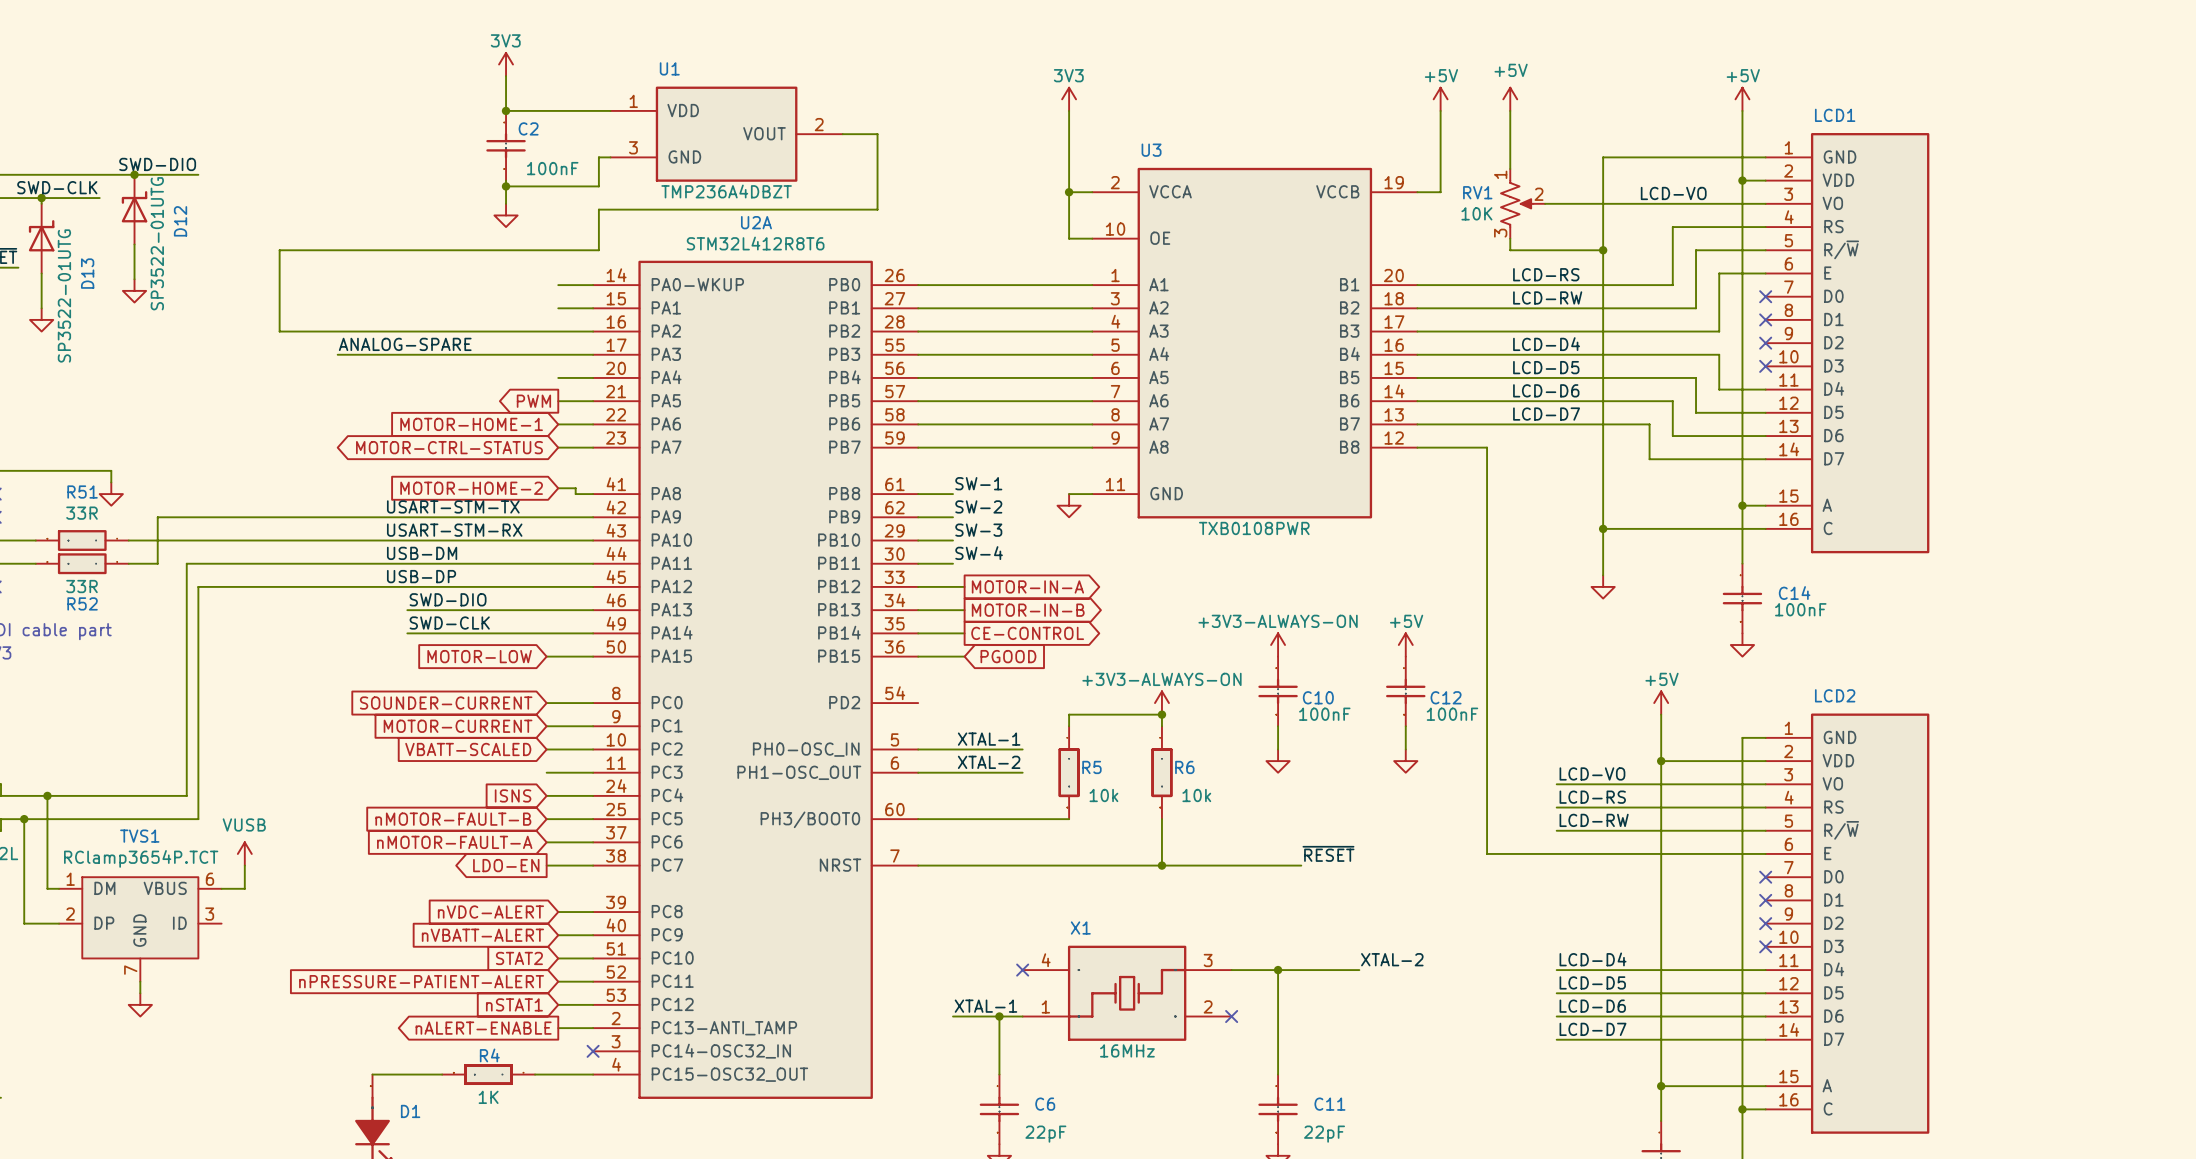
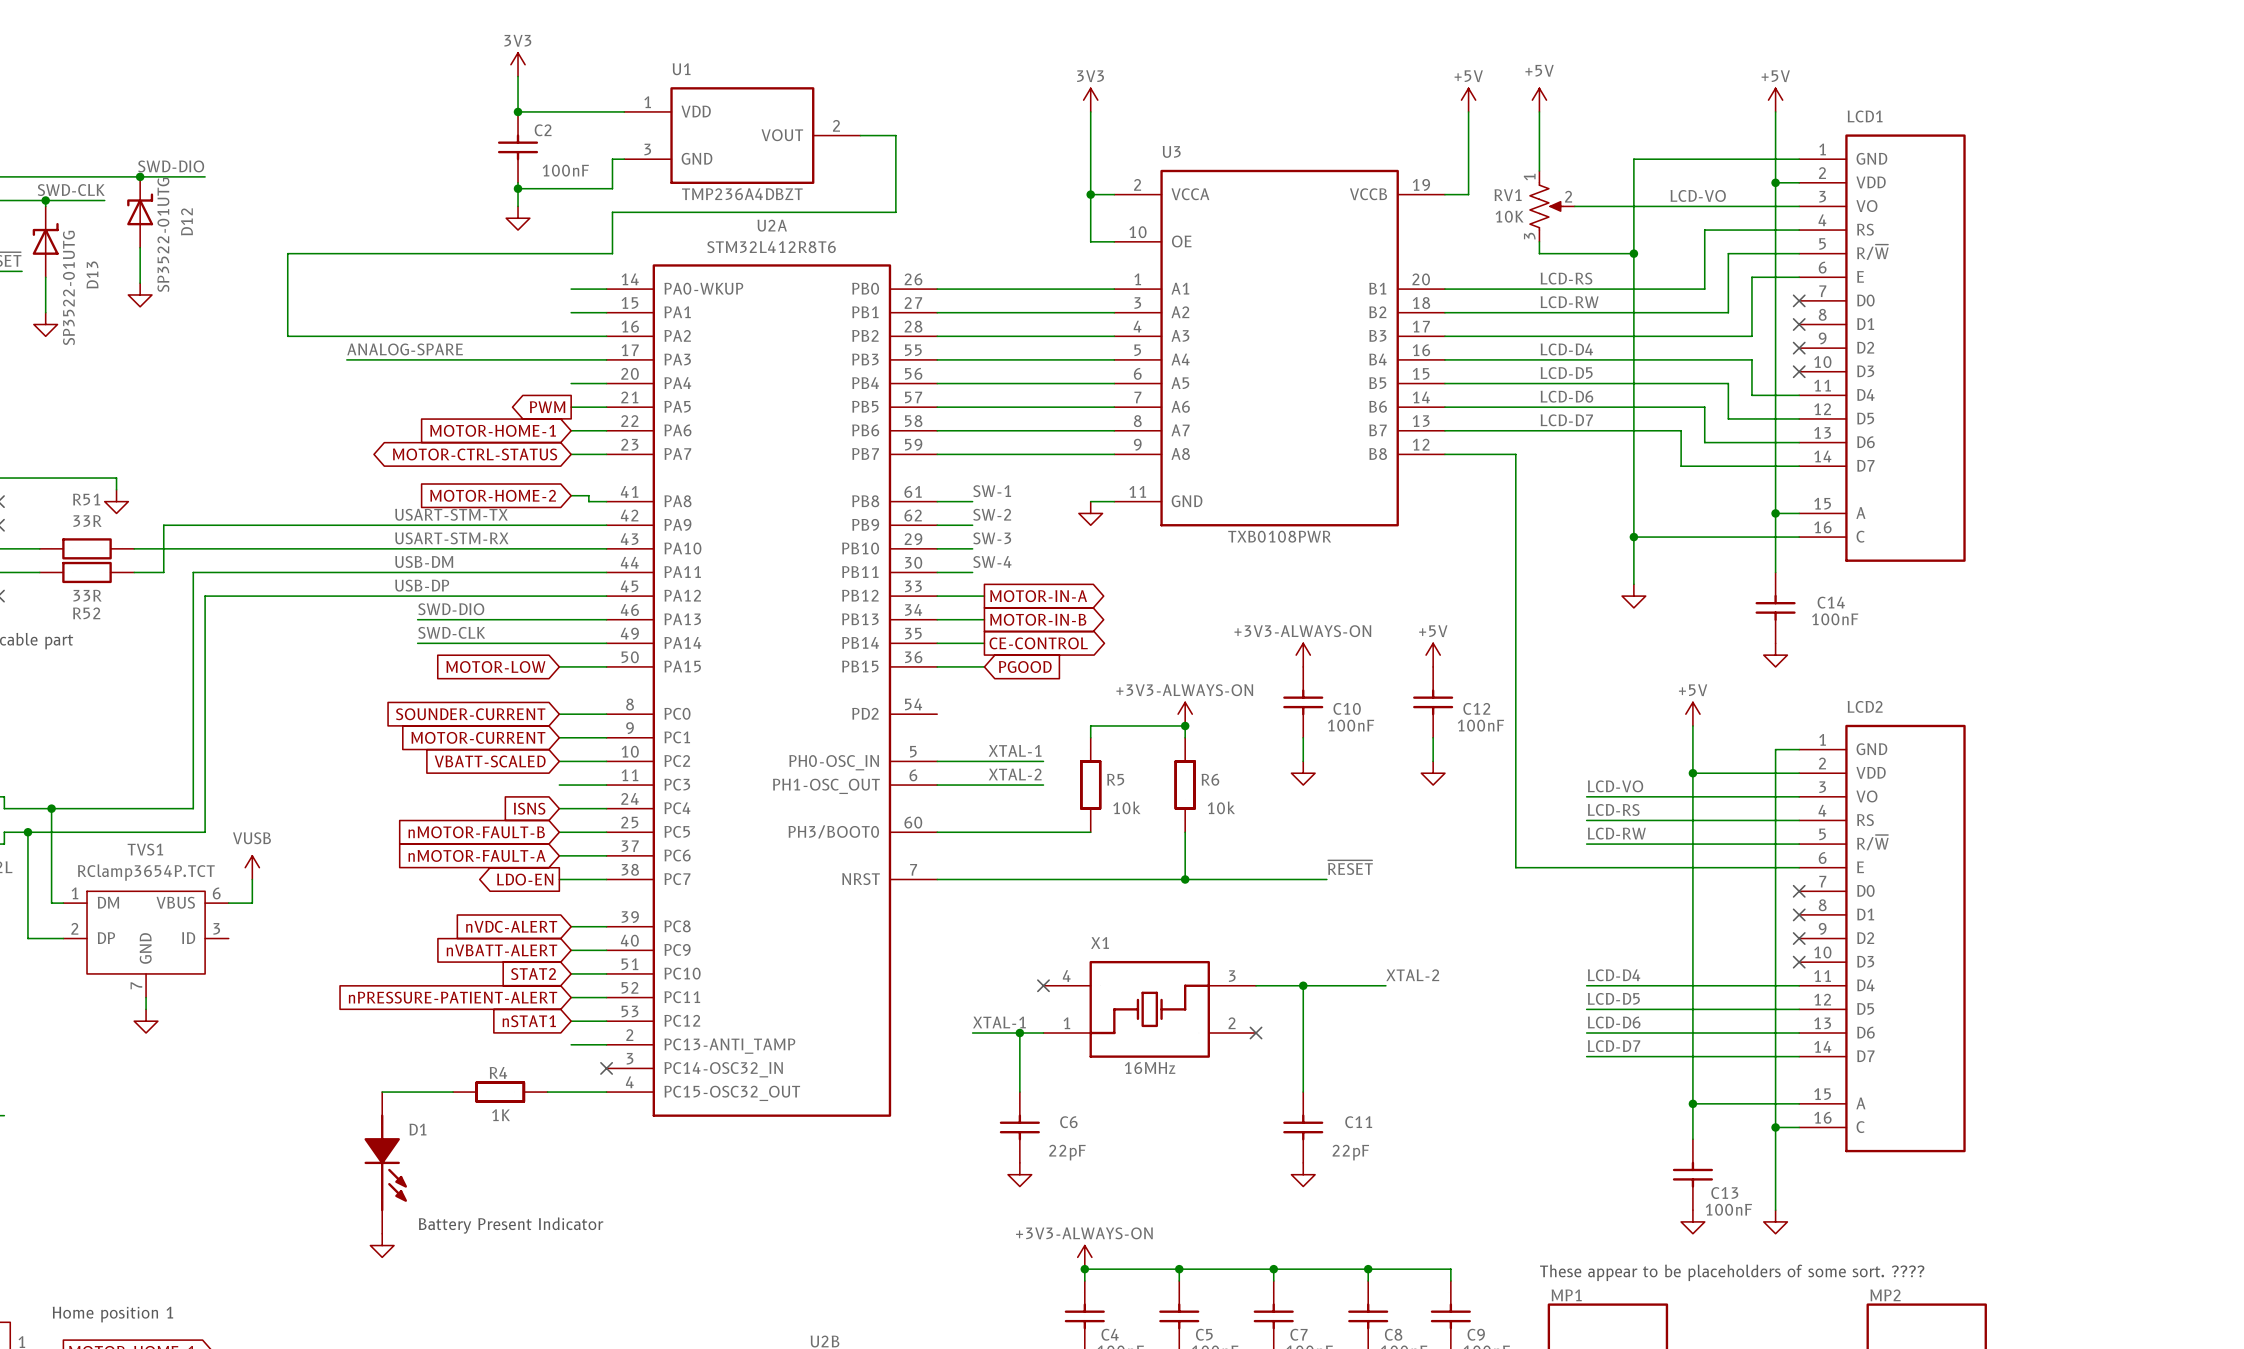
global label: nALERT-ENABLE (483, 1028) -> none

